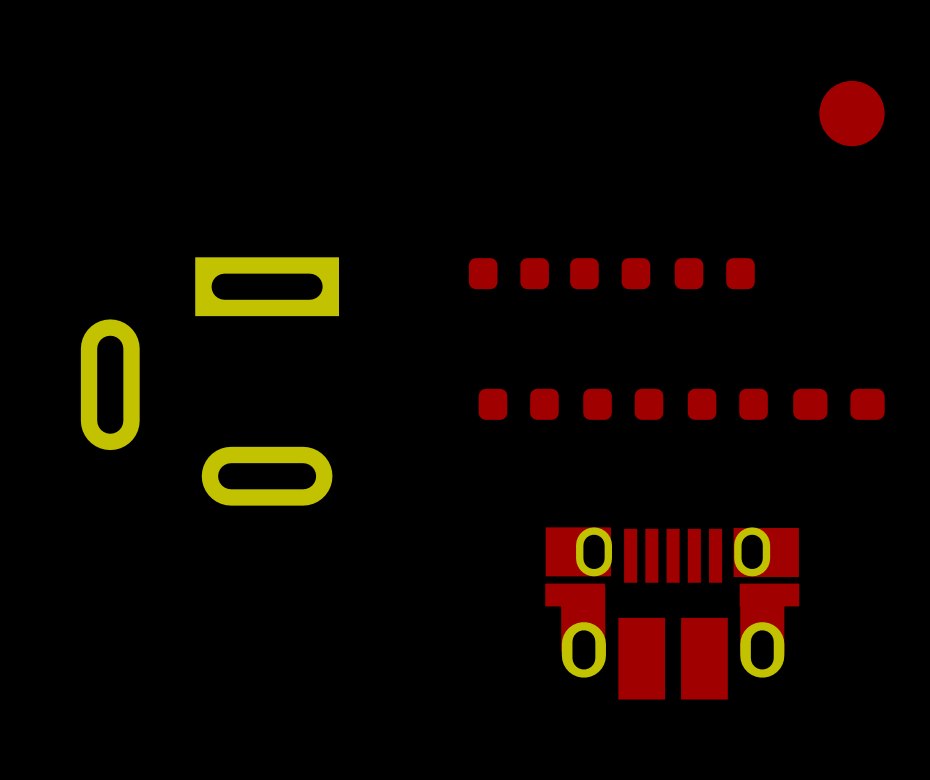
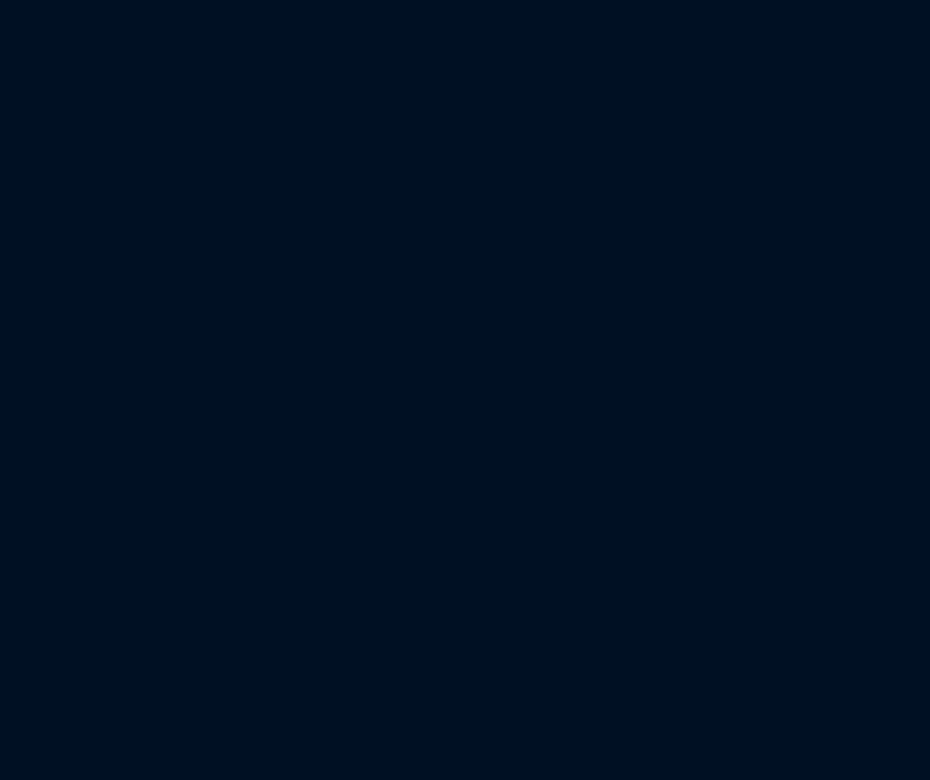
part: (851, 113) -> none
part: (508, 273) -> none
part: (610, 273) -> none
part: (714, 273) -> none
part: (209, 381) -> none
part: (518, 404) -> none
part: (623, 404) -> none
part: (727, 404) -> none
part: (838, 404) -> none
part: (672, 613) -> none

